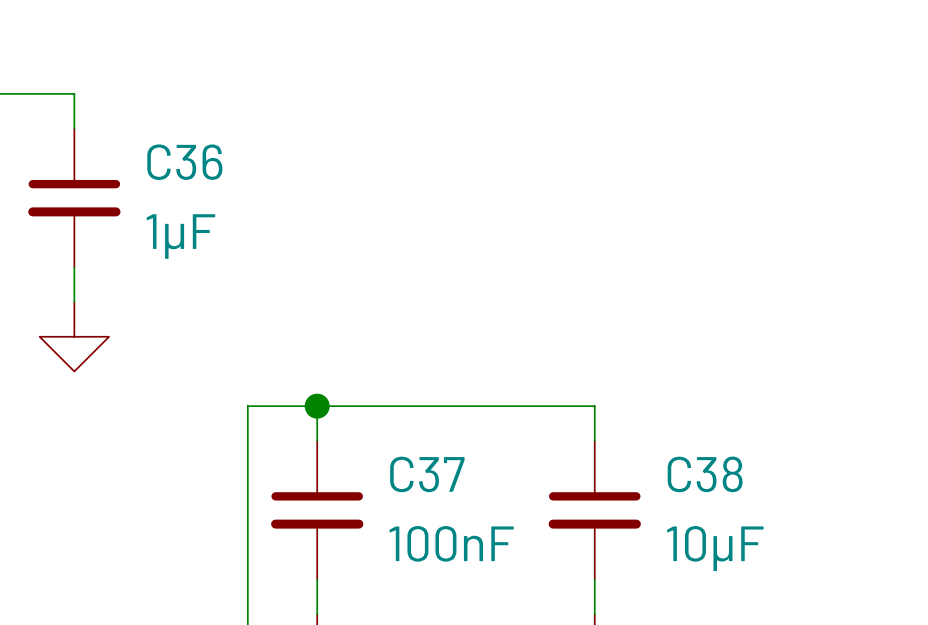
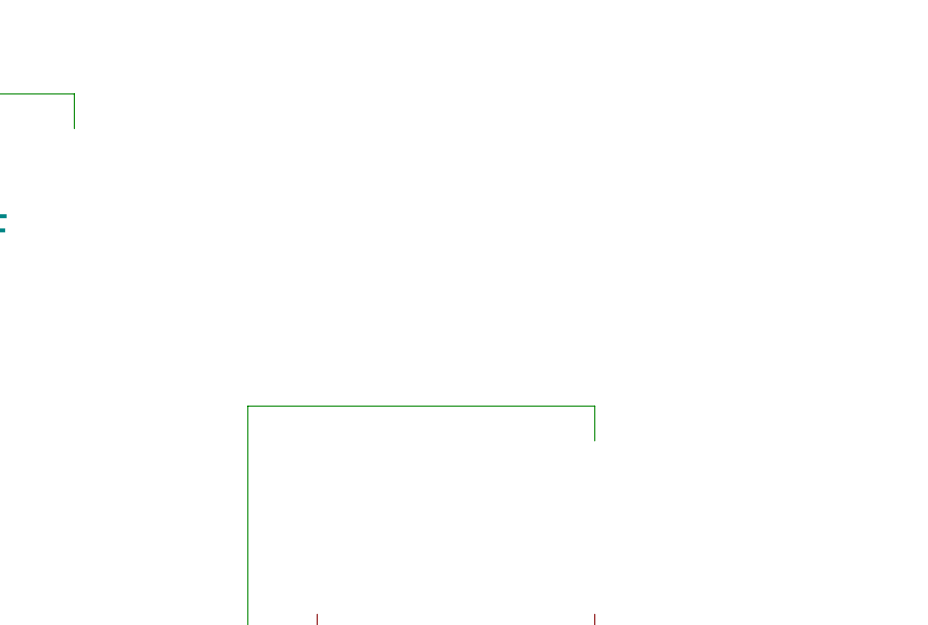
C36: 1μF (74, 198) -> none
wire: (74, 267) (74, 302) -> none
power symbol: (74, 336) -> none
wire: (317, 406) (317, 440) -> none
junction: (317, 406) -> none
C37: 100nF (317, 510) -> none
C38: 10μF (594, 510) -> none
wire: (317, 579) (317, 614) -> none
wire: (594, 579) (594, 614) -> none

